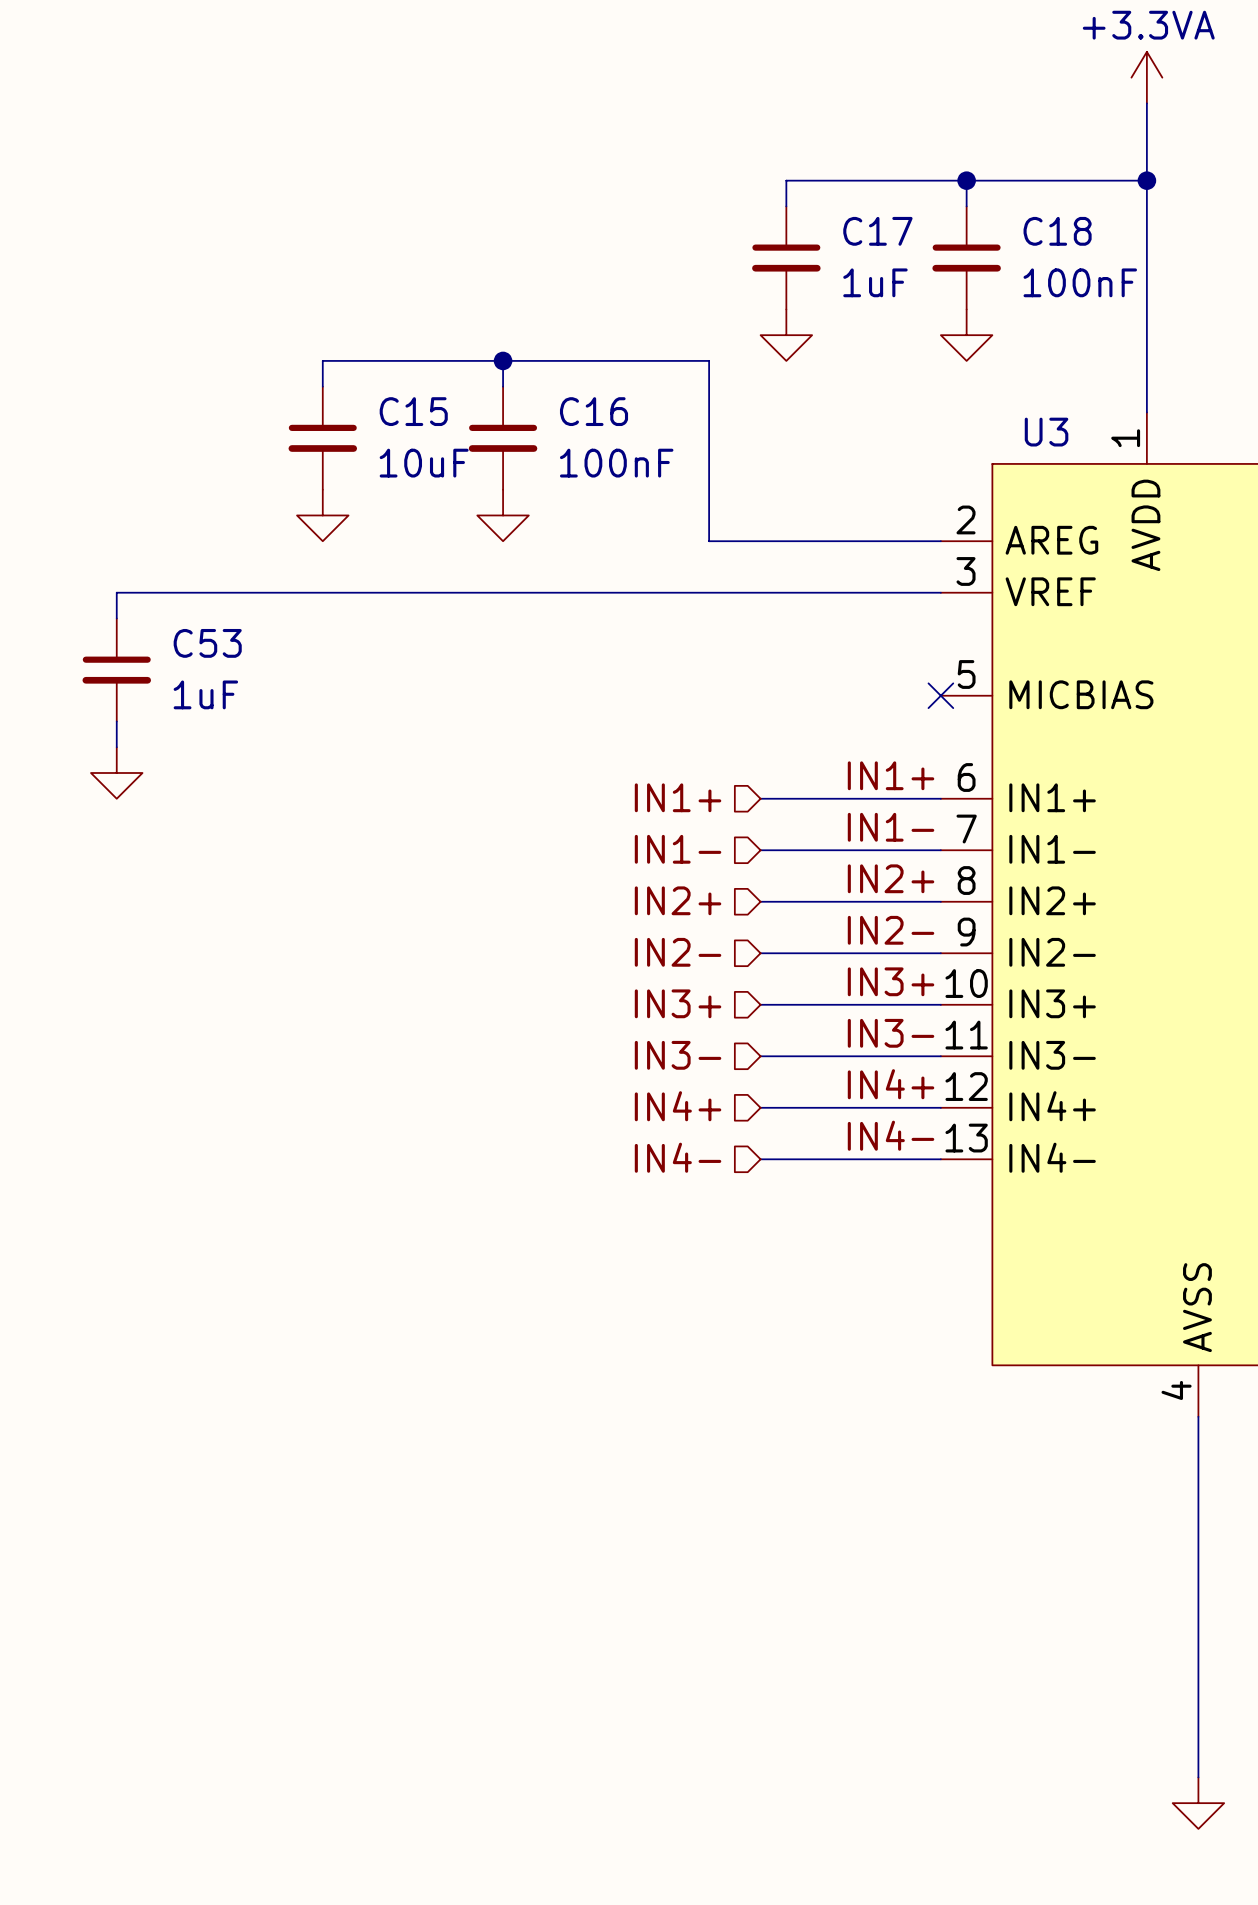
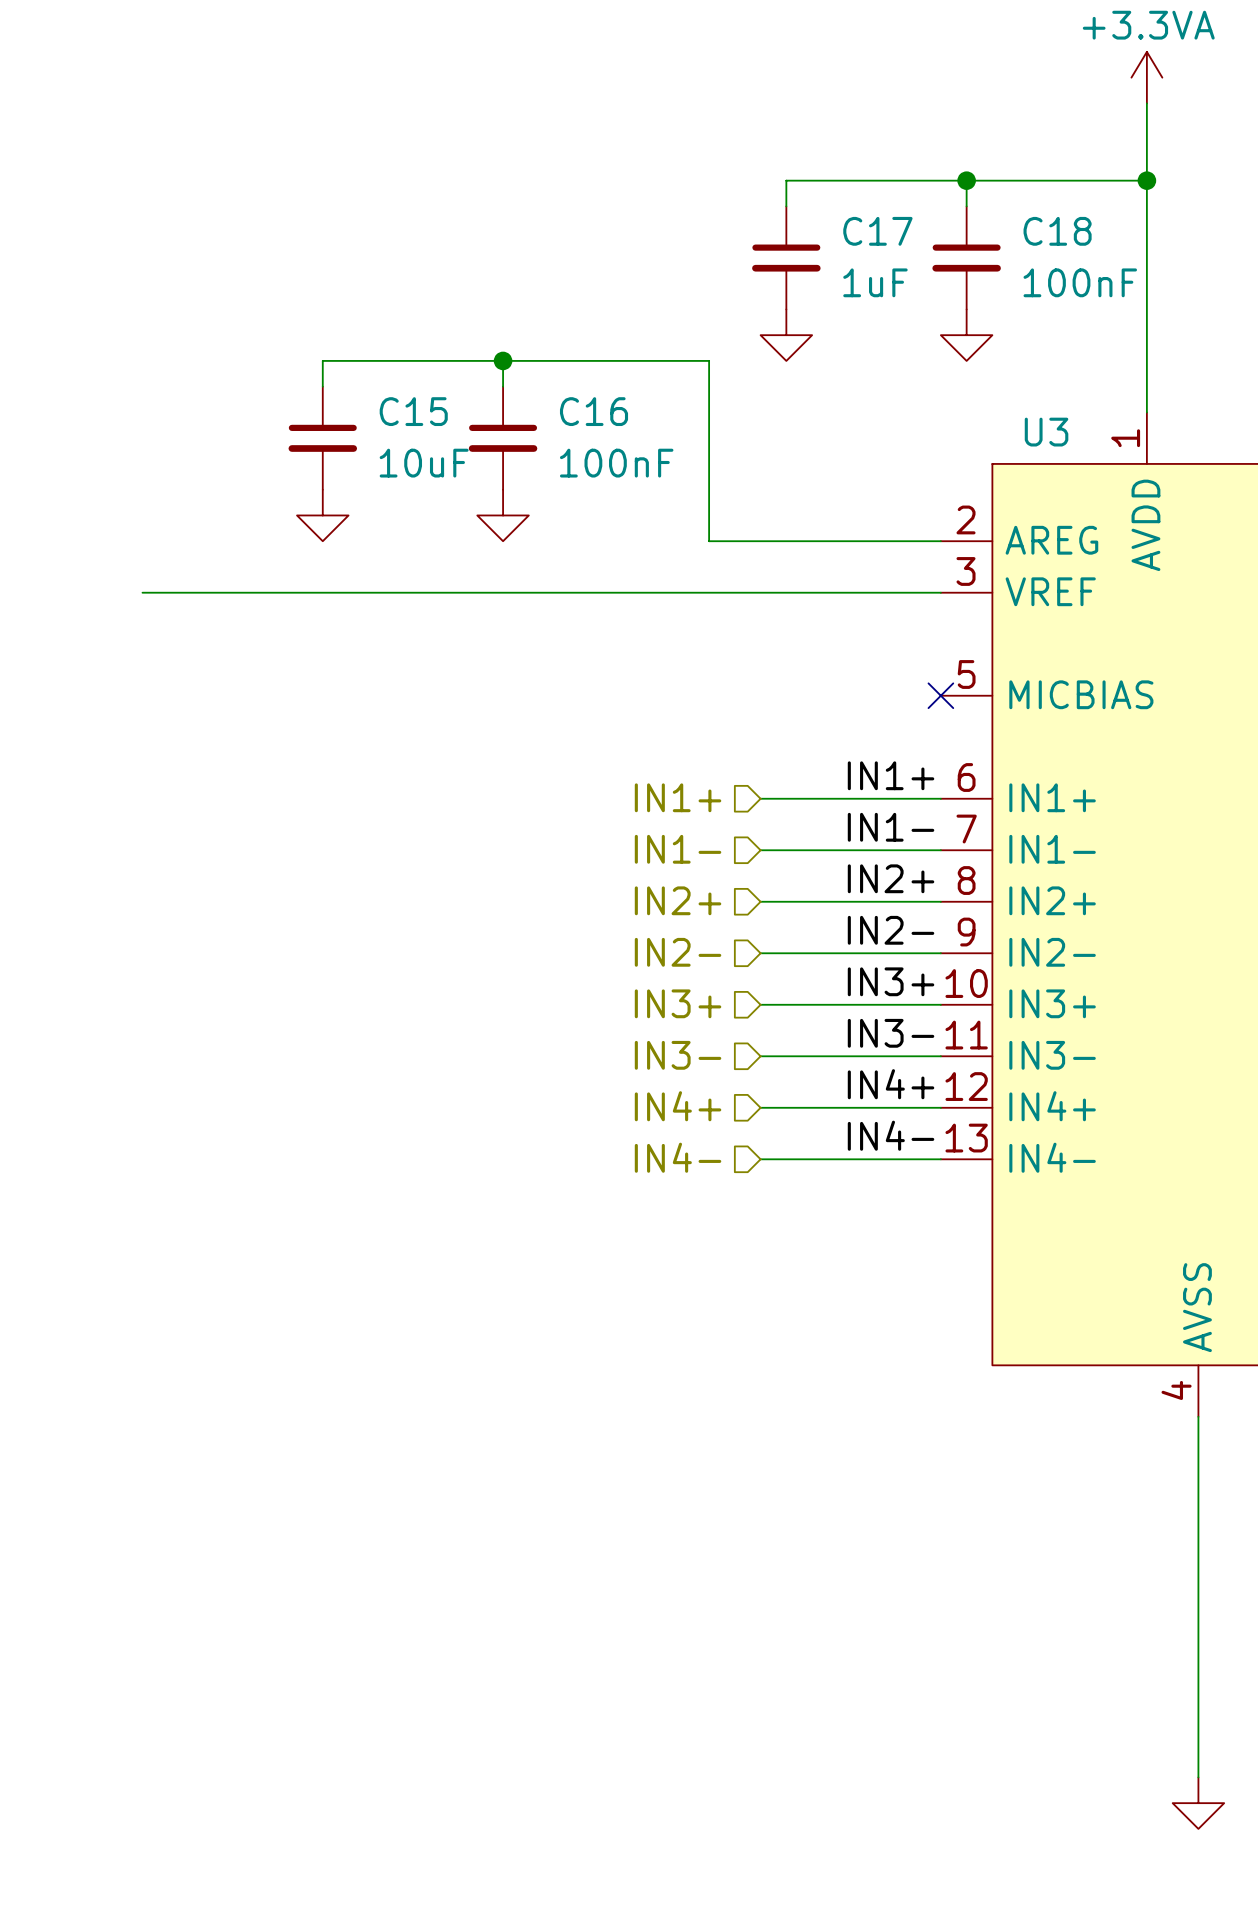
wire: (142, 592) (116, 592) (116, 618) -> none
C53: 1uF (116, 669) -> none
wire: (116, 721) (116, 747) -> none
power symbol: (116, 773) -> none

